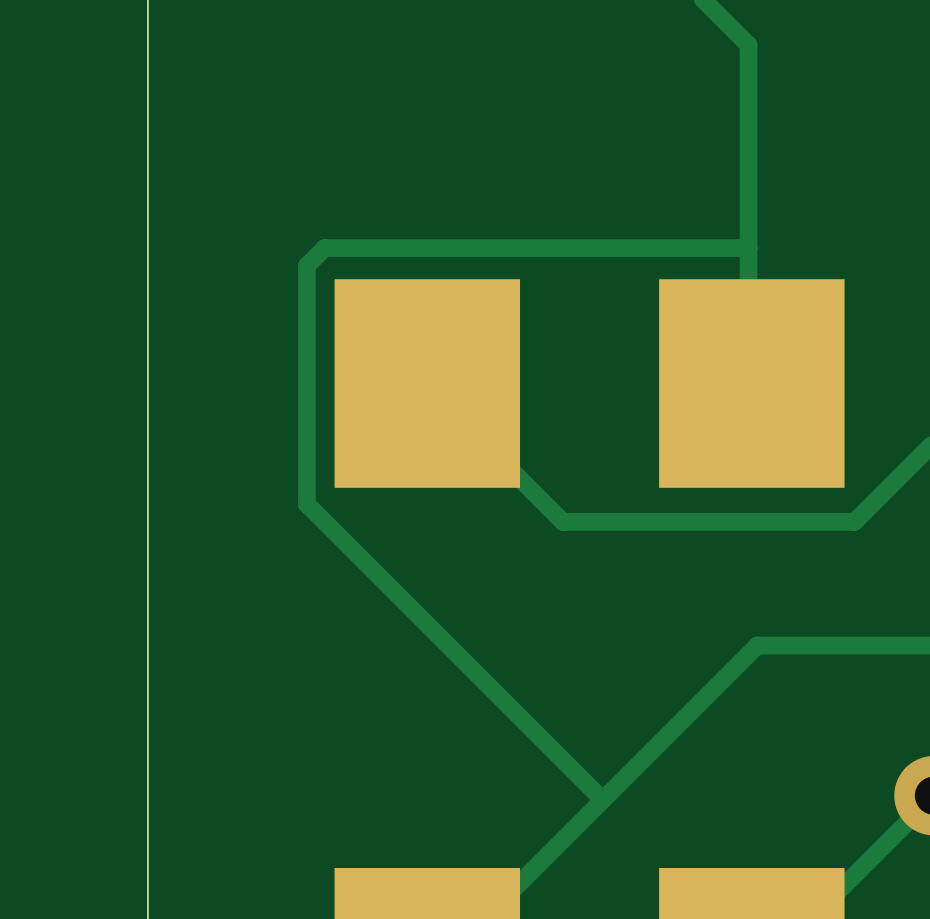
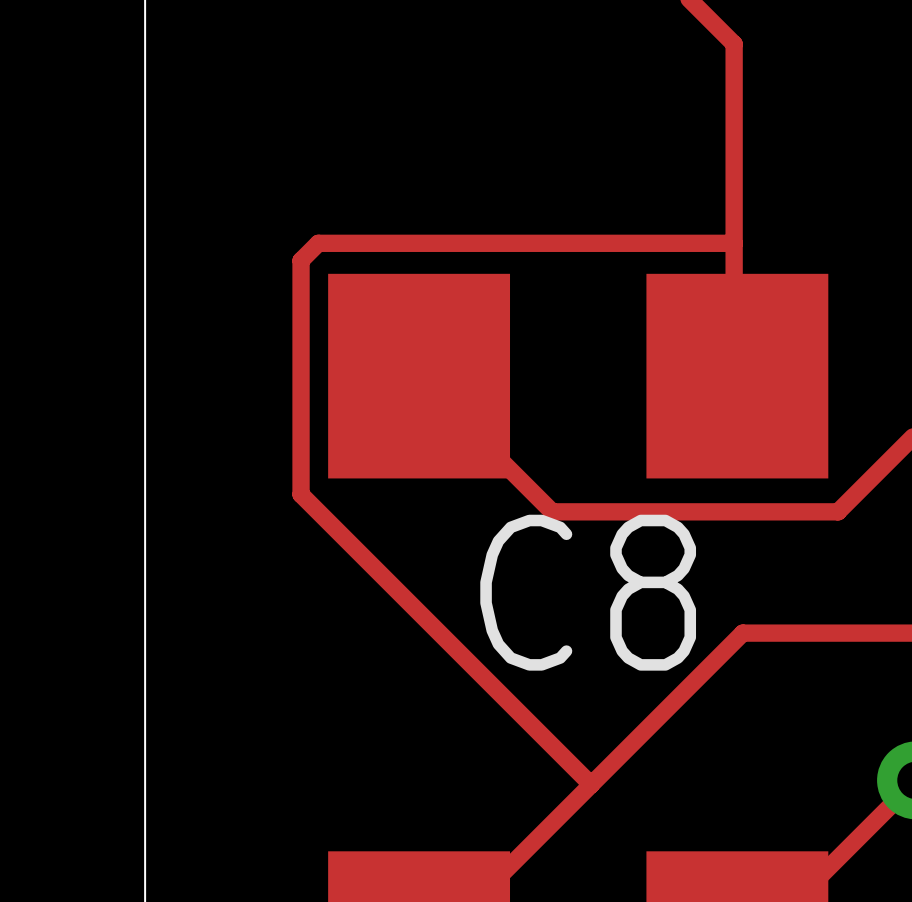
C8 name: none -> C8 (588, 592)

